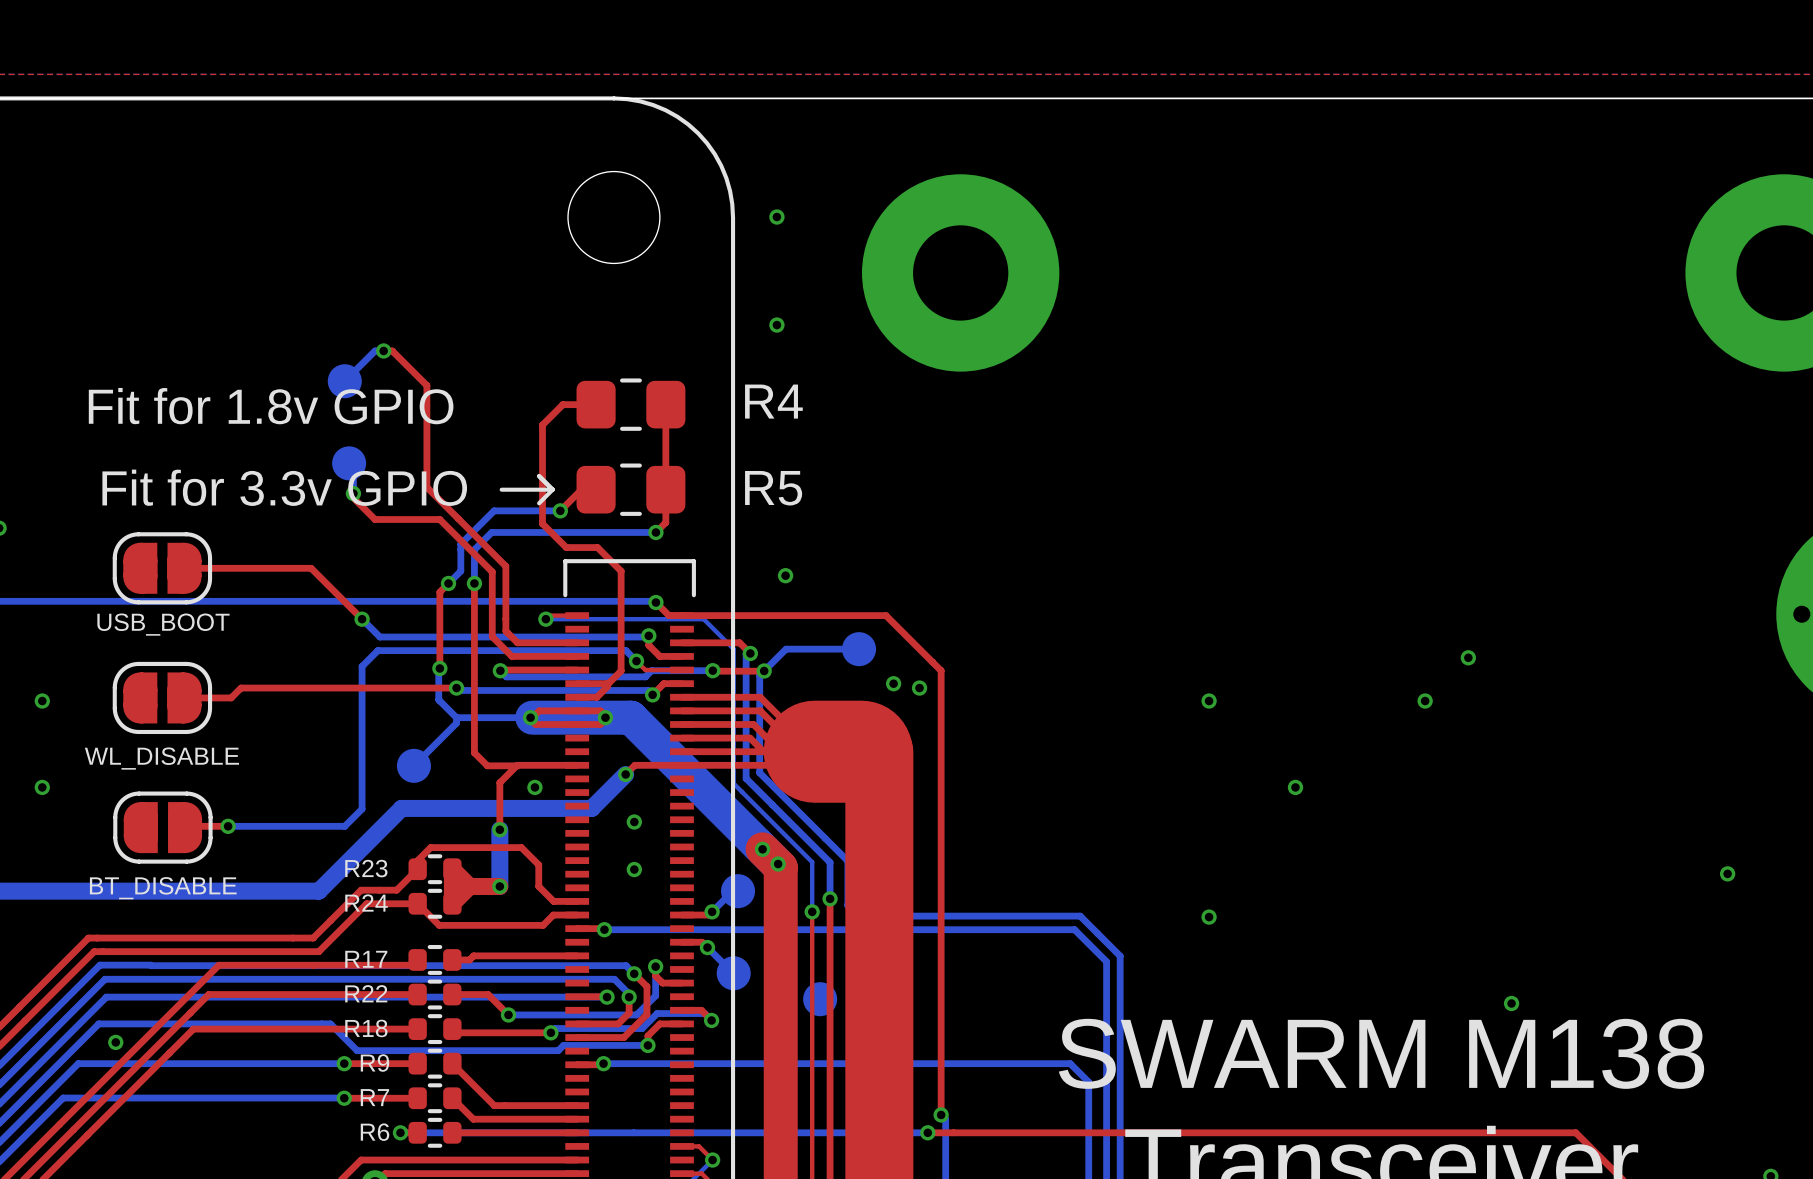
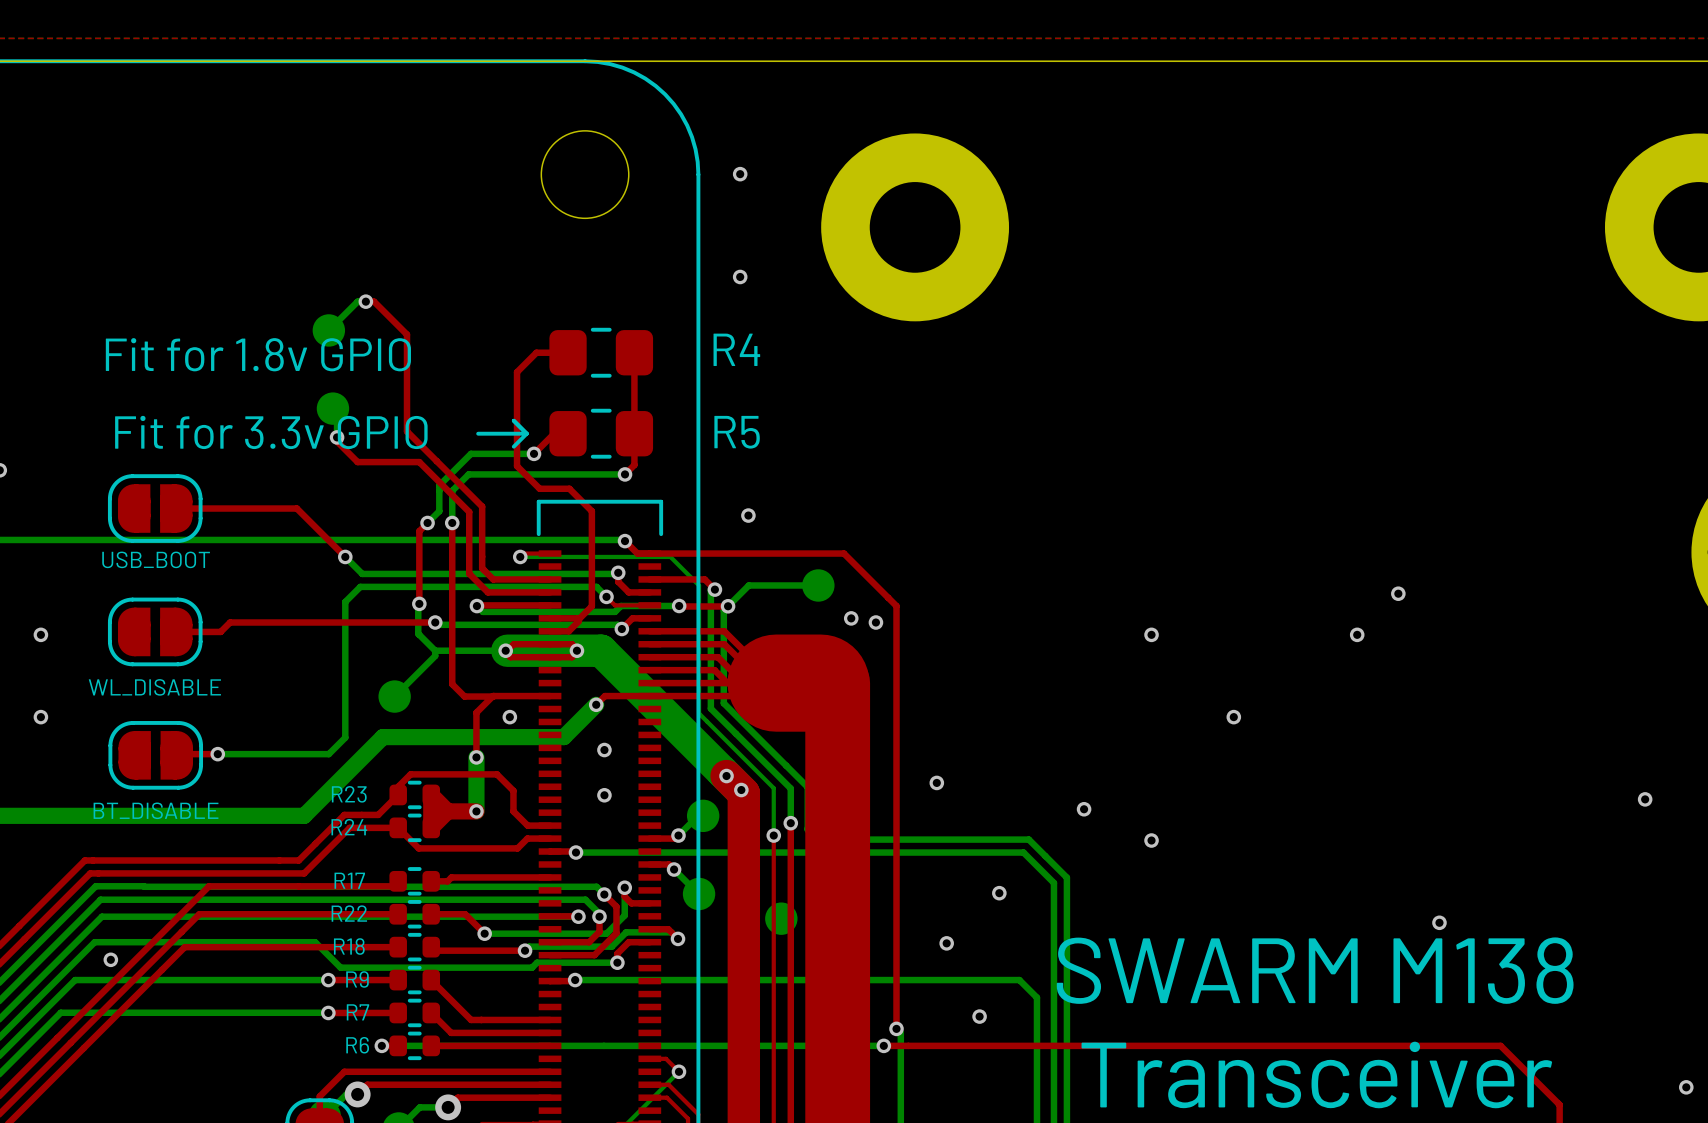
via: none -> (936, 782)
via: none -> (1084, 809)
via: none -> (999, 893)
via: none -> (946, 943)
via: none -> (979, 1016)

